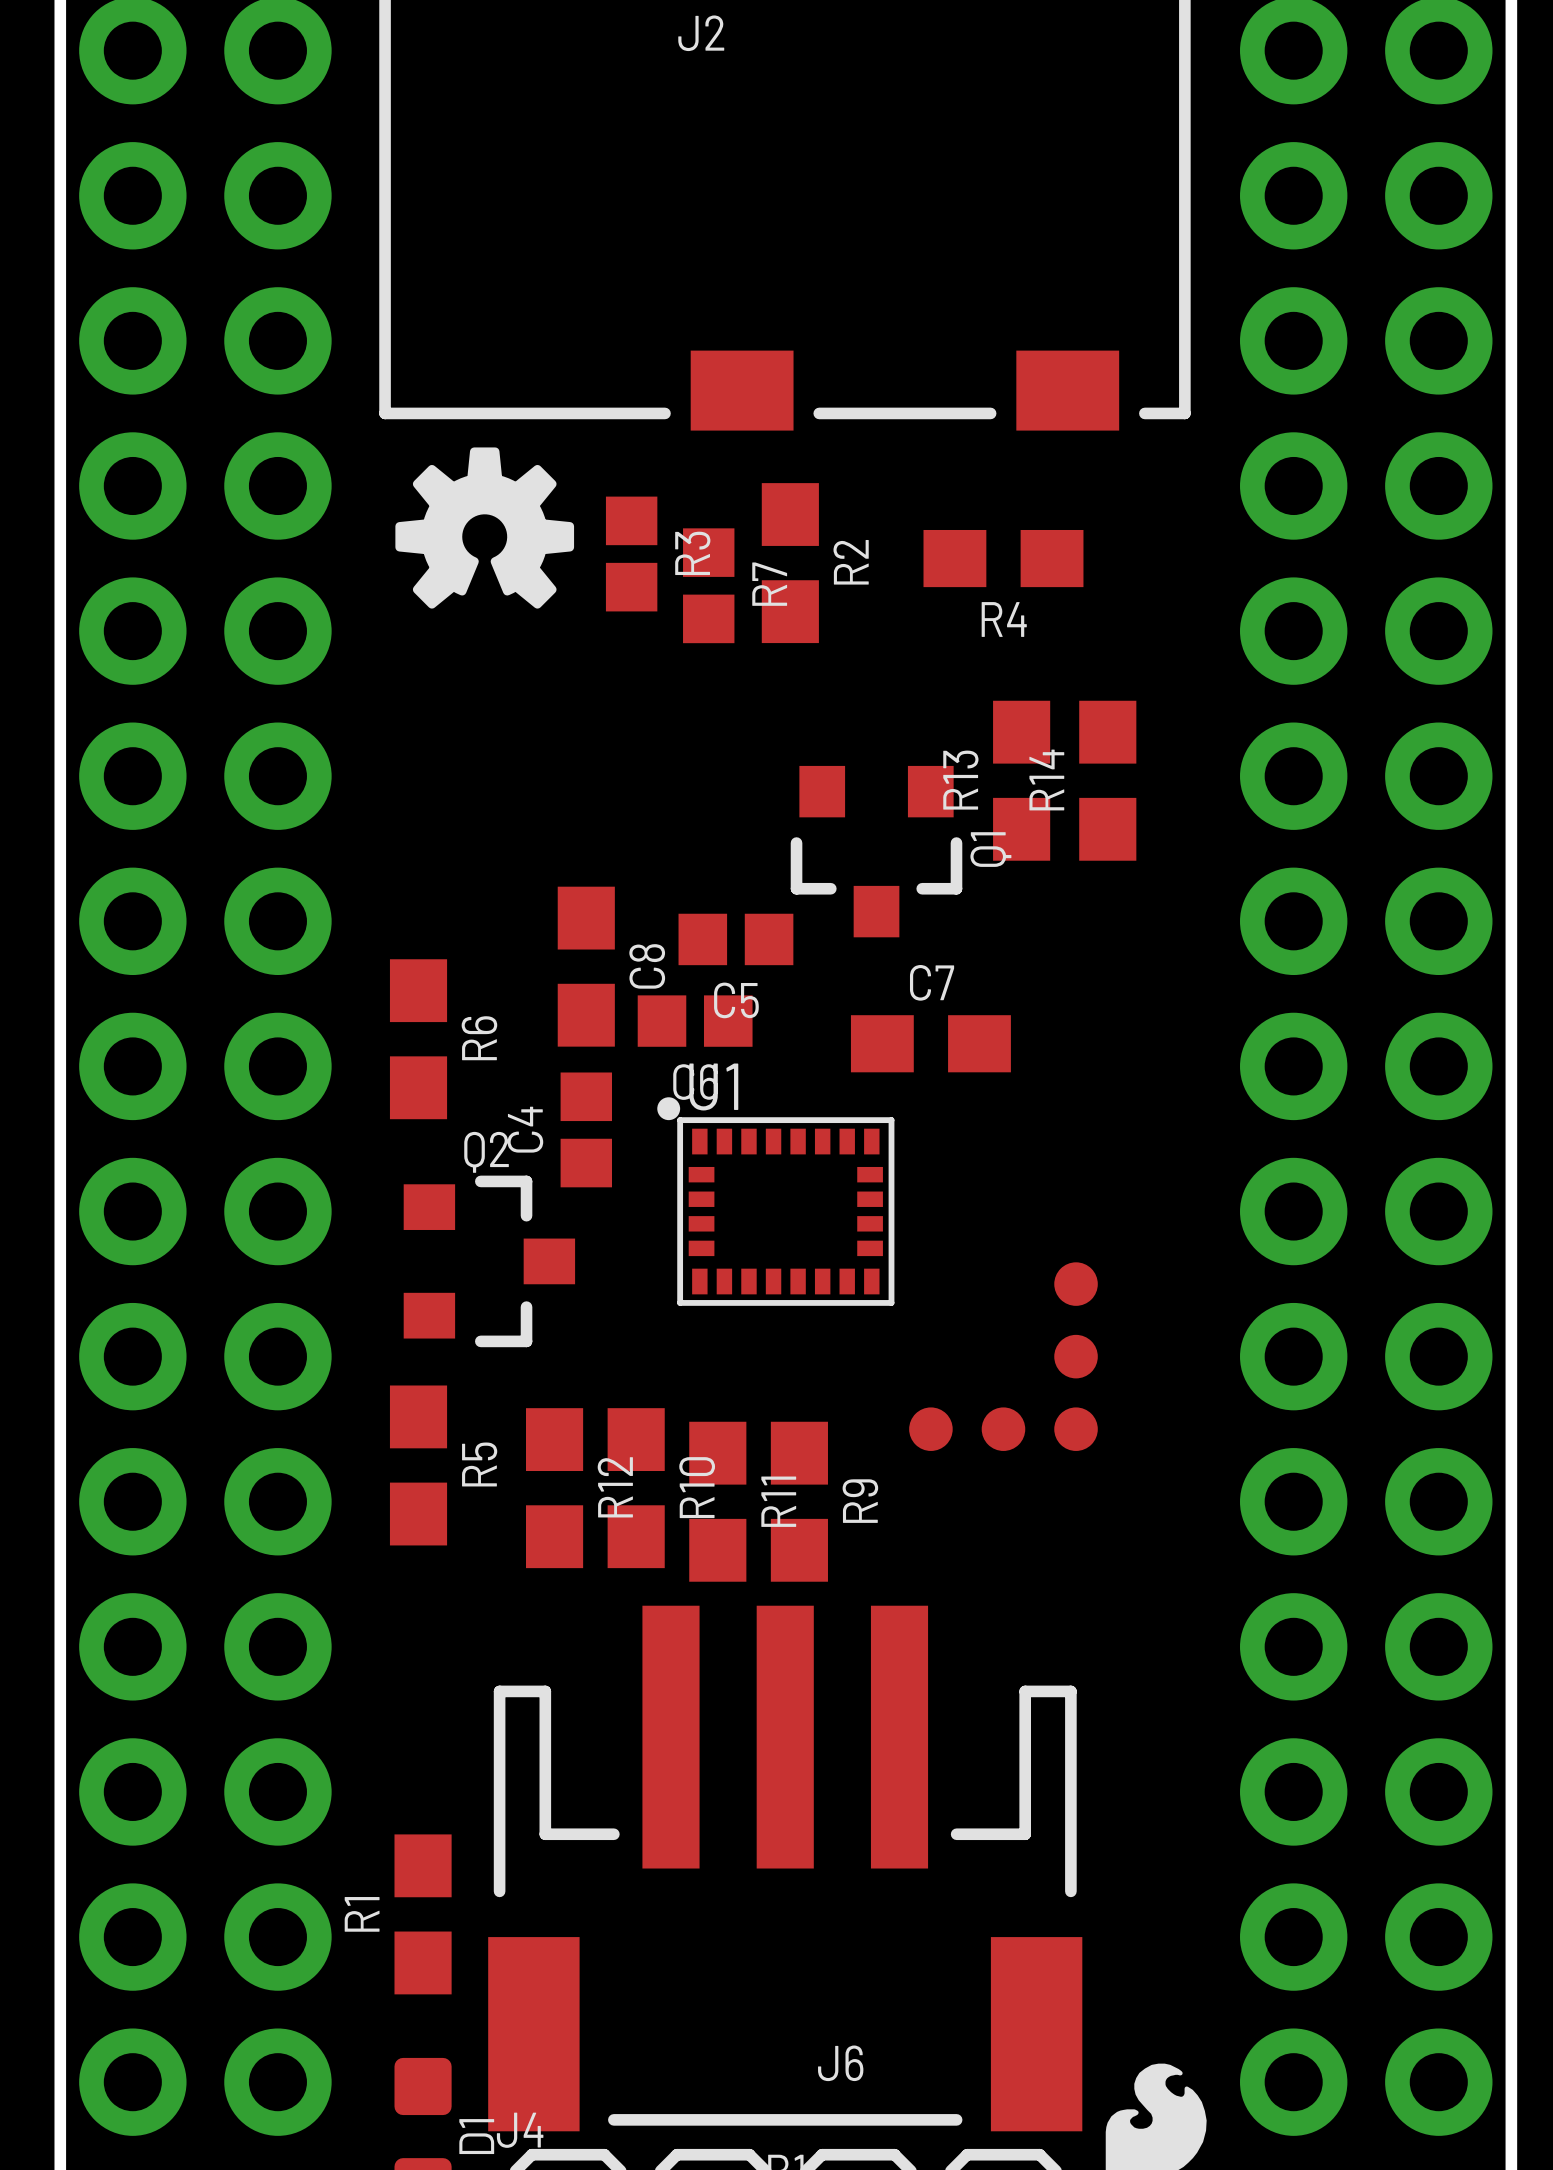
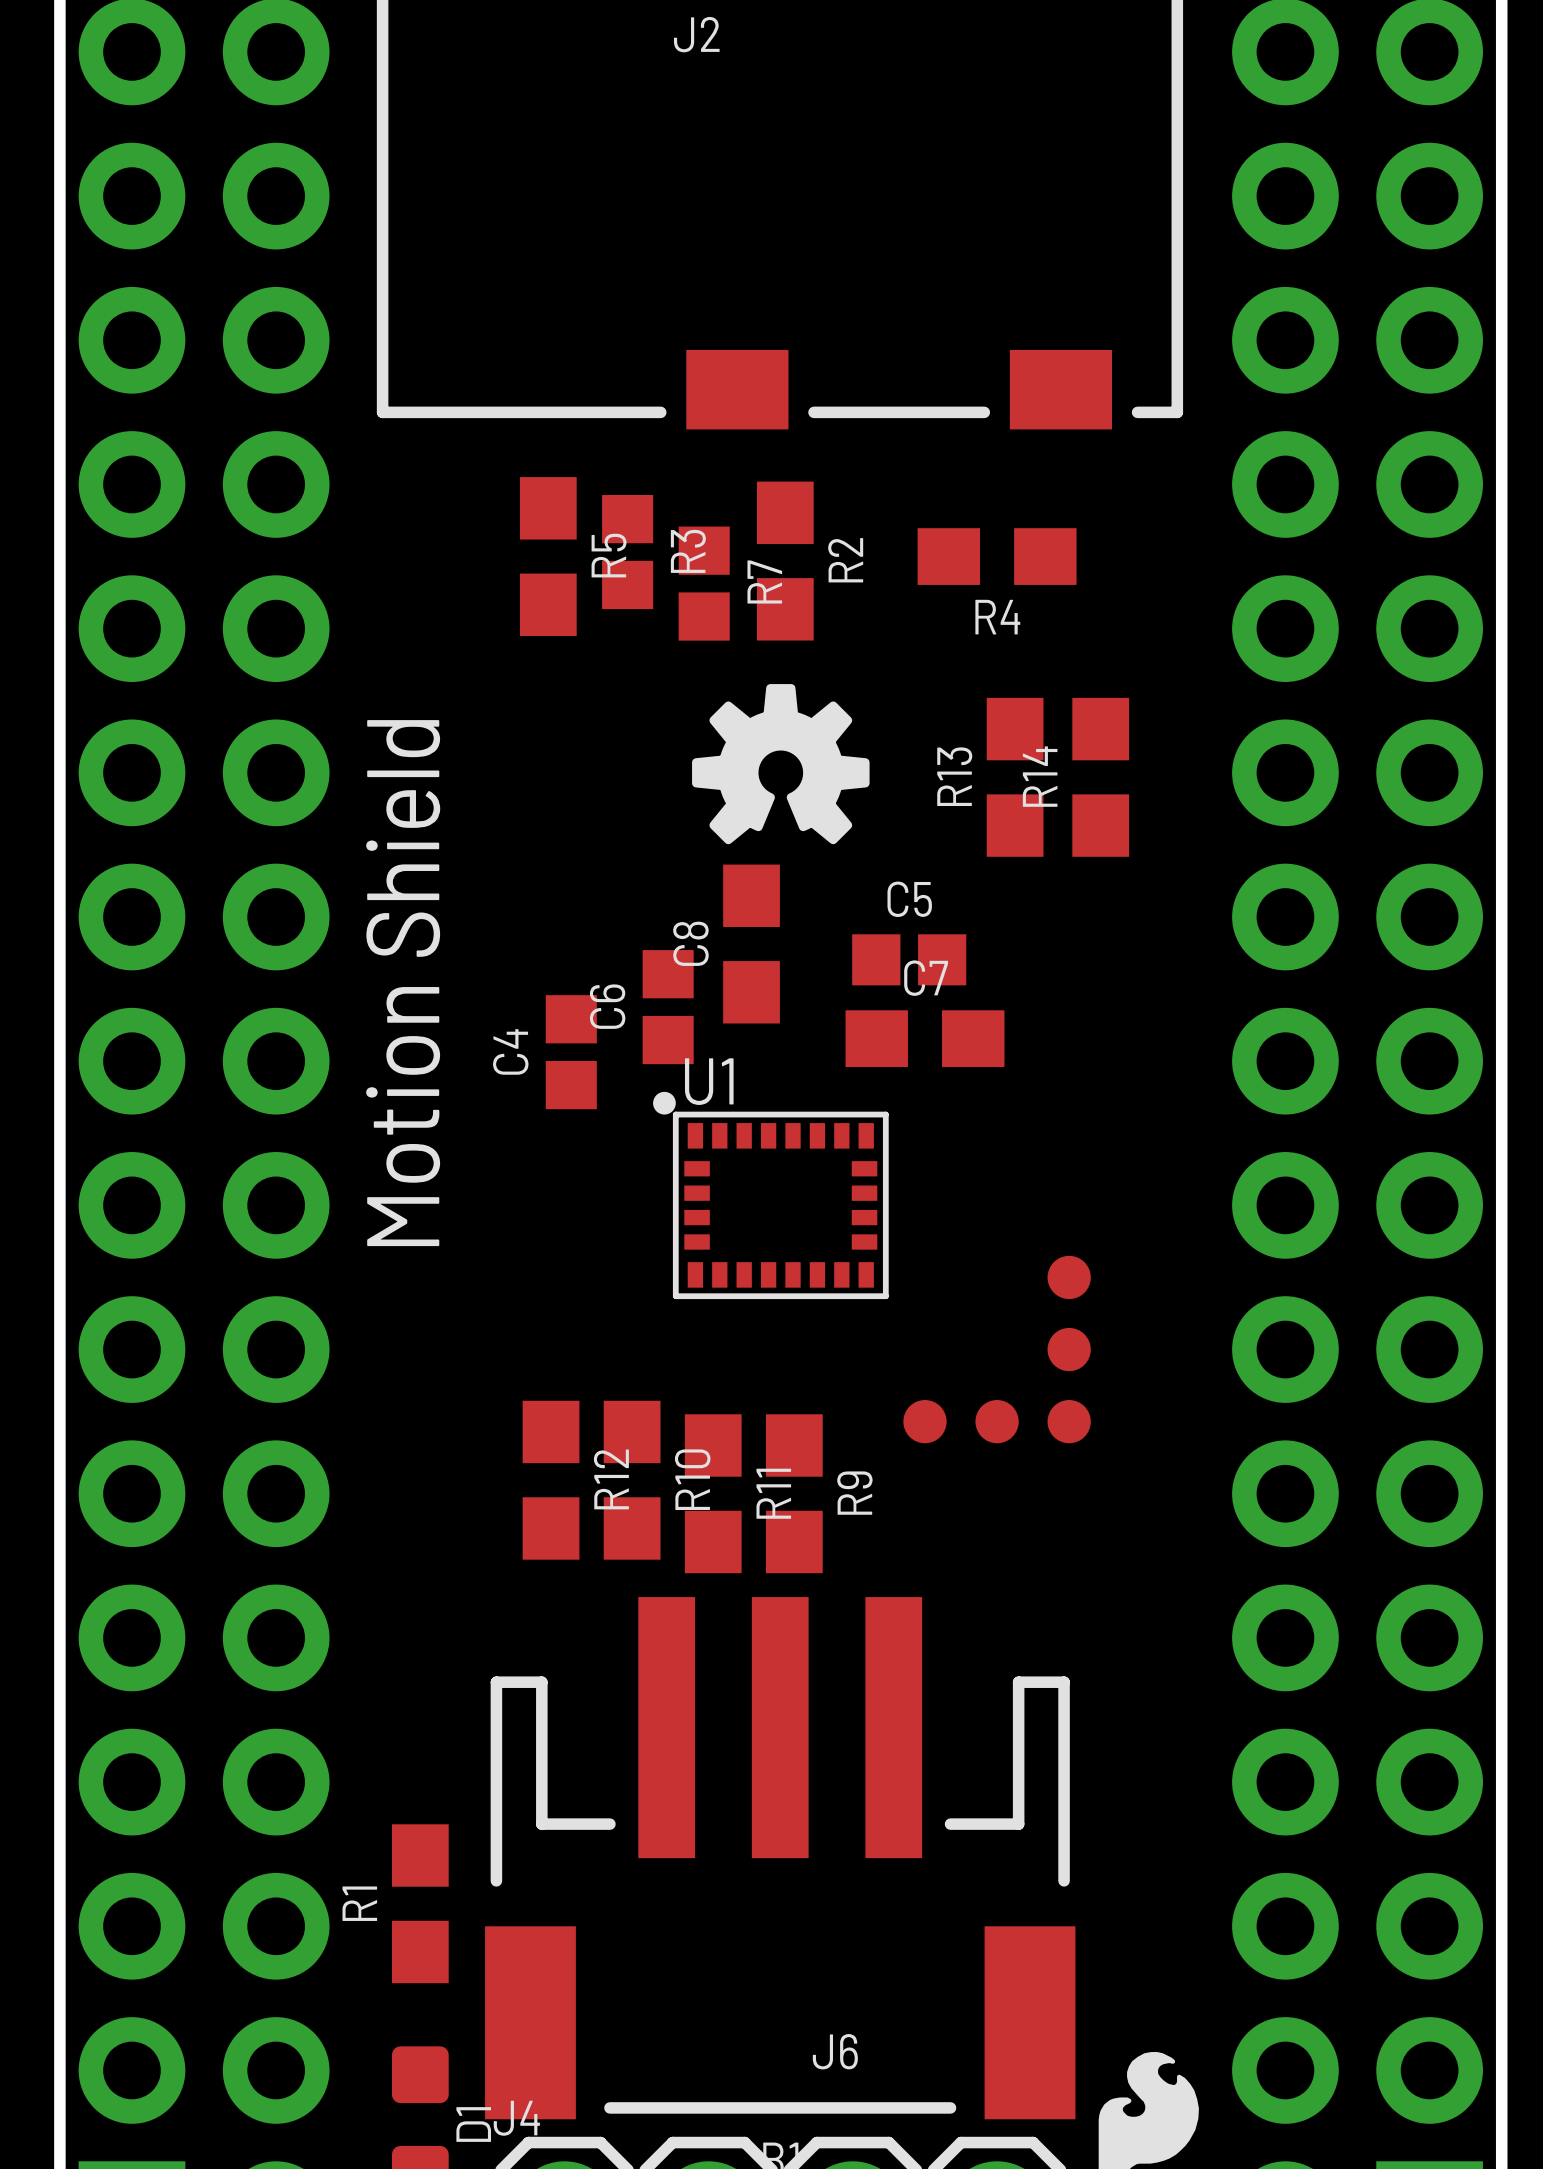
drawing position: (484, 528) -> (780, 764)
Q1: (876, 851) -> none
C5 position: (735, 939) -> (909, 959)
C8 position: (586, 966) -> (751, 944)
C8 name position: C8 (647, 966) -> C8 (690, 943)
text: none -> Motion Shield (403, 983)
C5 name position: C5 (736, 1000) -> C5 (909, 899)
C6 rotation: 0° (695, 1021) -> 90° clockwise (668, 1007)
R6: (418, 1039) -> none
C4 position: (586, 1129) -> (571, 1052)
Q2: (489, 1261) -> none
R5 position: (418, 1465) -> (548, 556)

